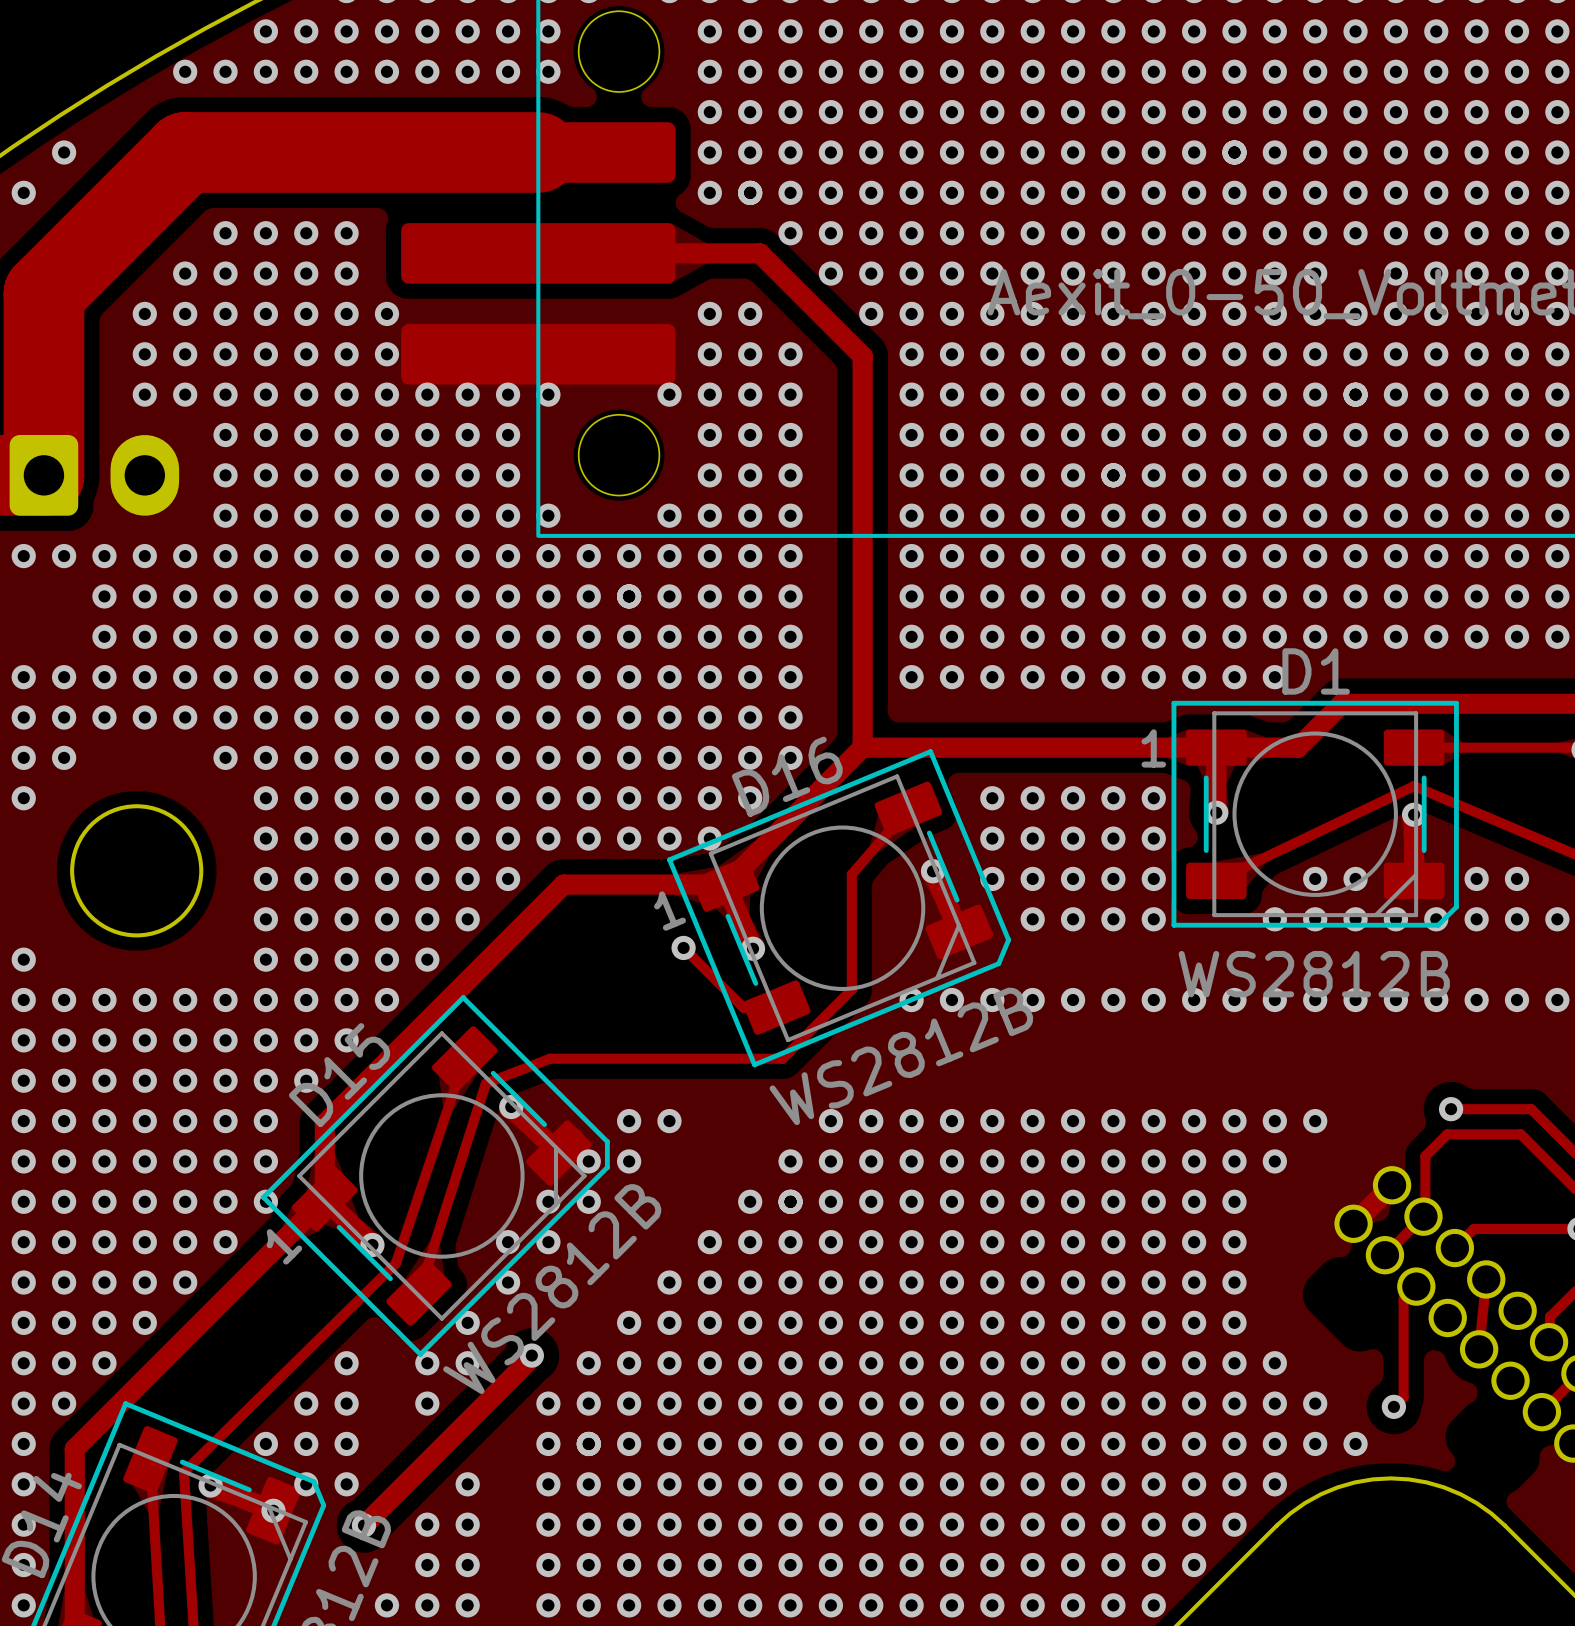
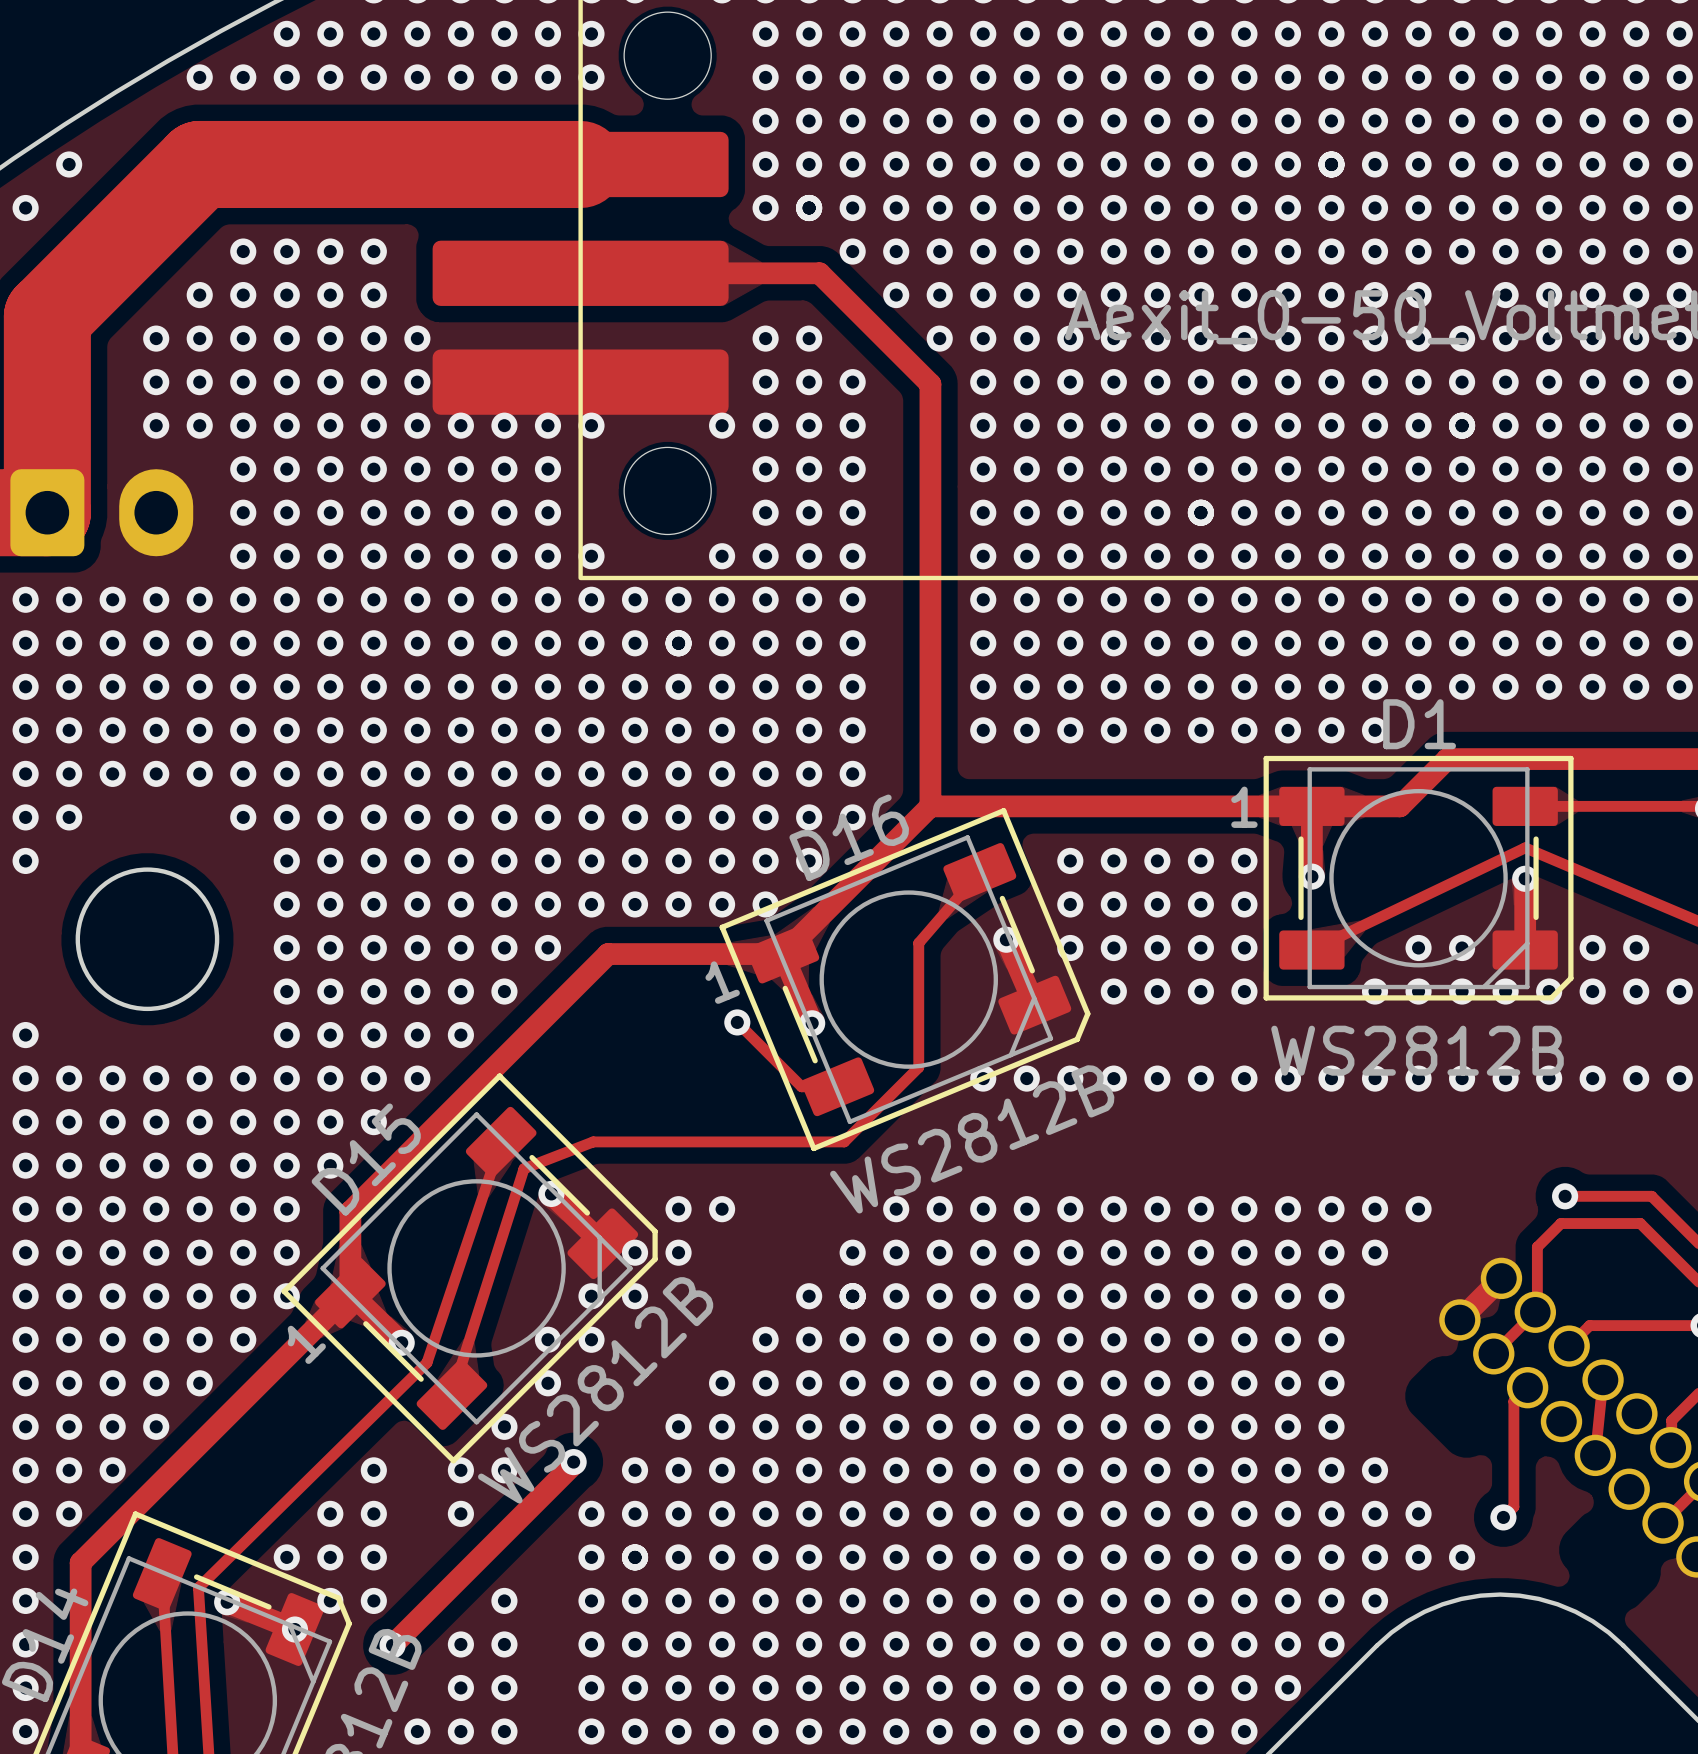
via: none -> (25, 643)
via: none -> (69, 643)
via: none -> (25, 686)
via: none -> (69, 686)

